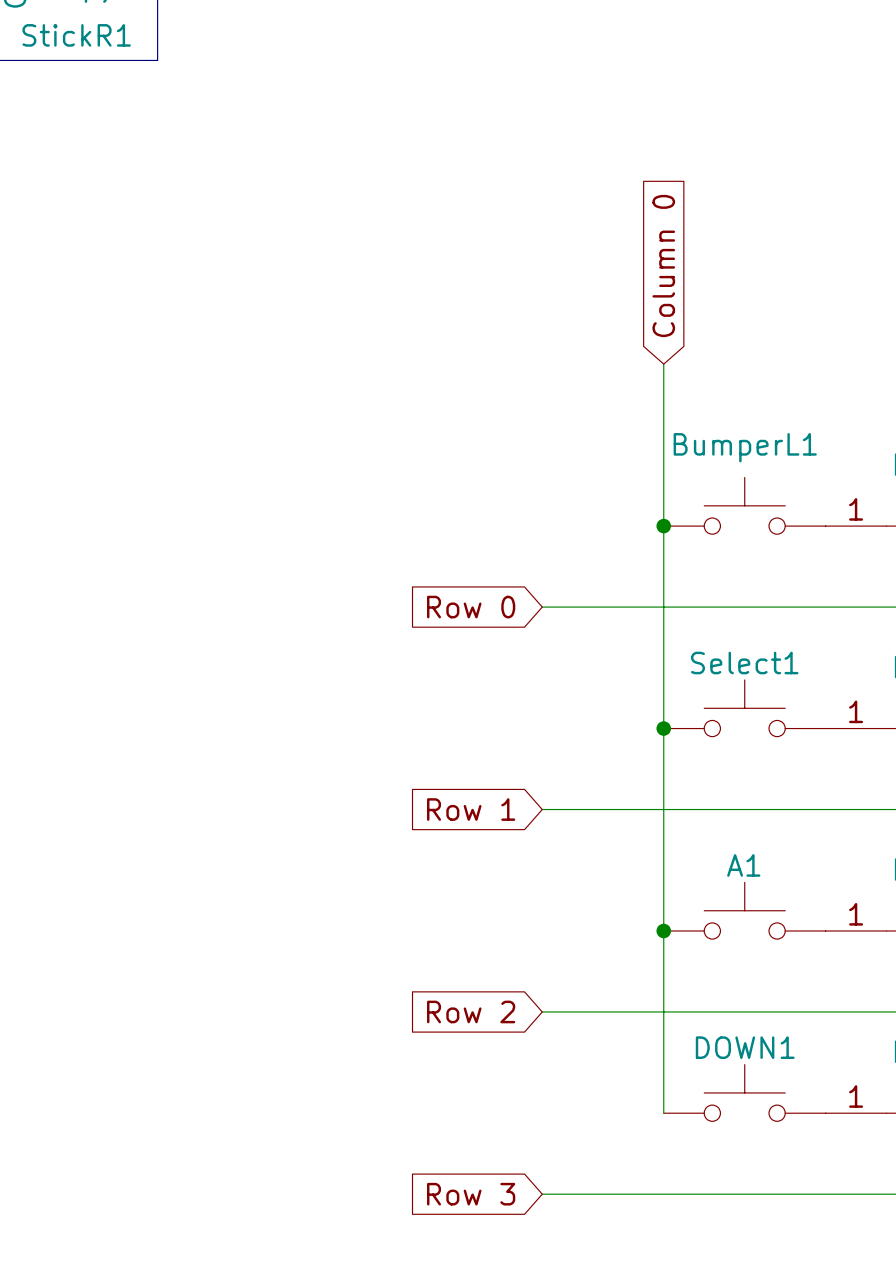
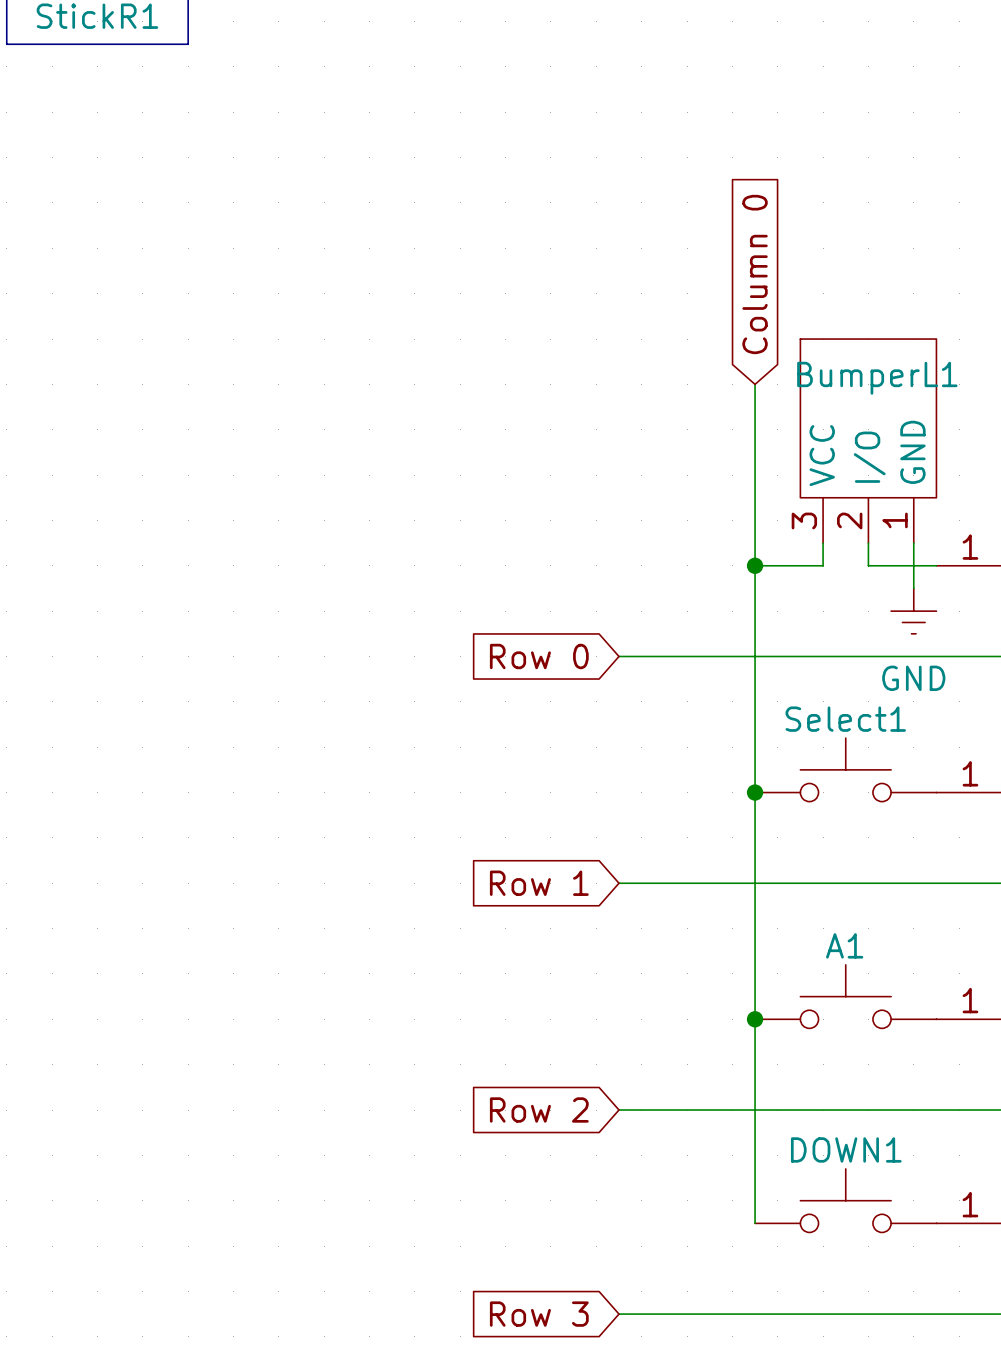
BumperL1 symbol: [663, 477, 826, 535] -> [800, 339, 937, 544]
wire: none -> (823, 543) (823, 565) (755, 565)
wire: none -> (868, 543) (868, 565) (936, 565)
wire: none -> (913, 543) (913, 588)
power symbol: none -> GND (913, 611)

